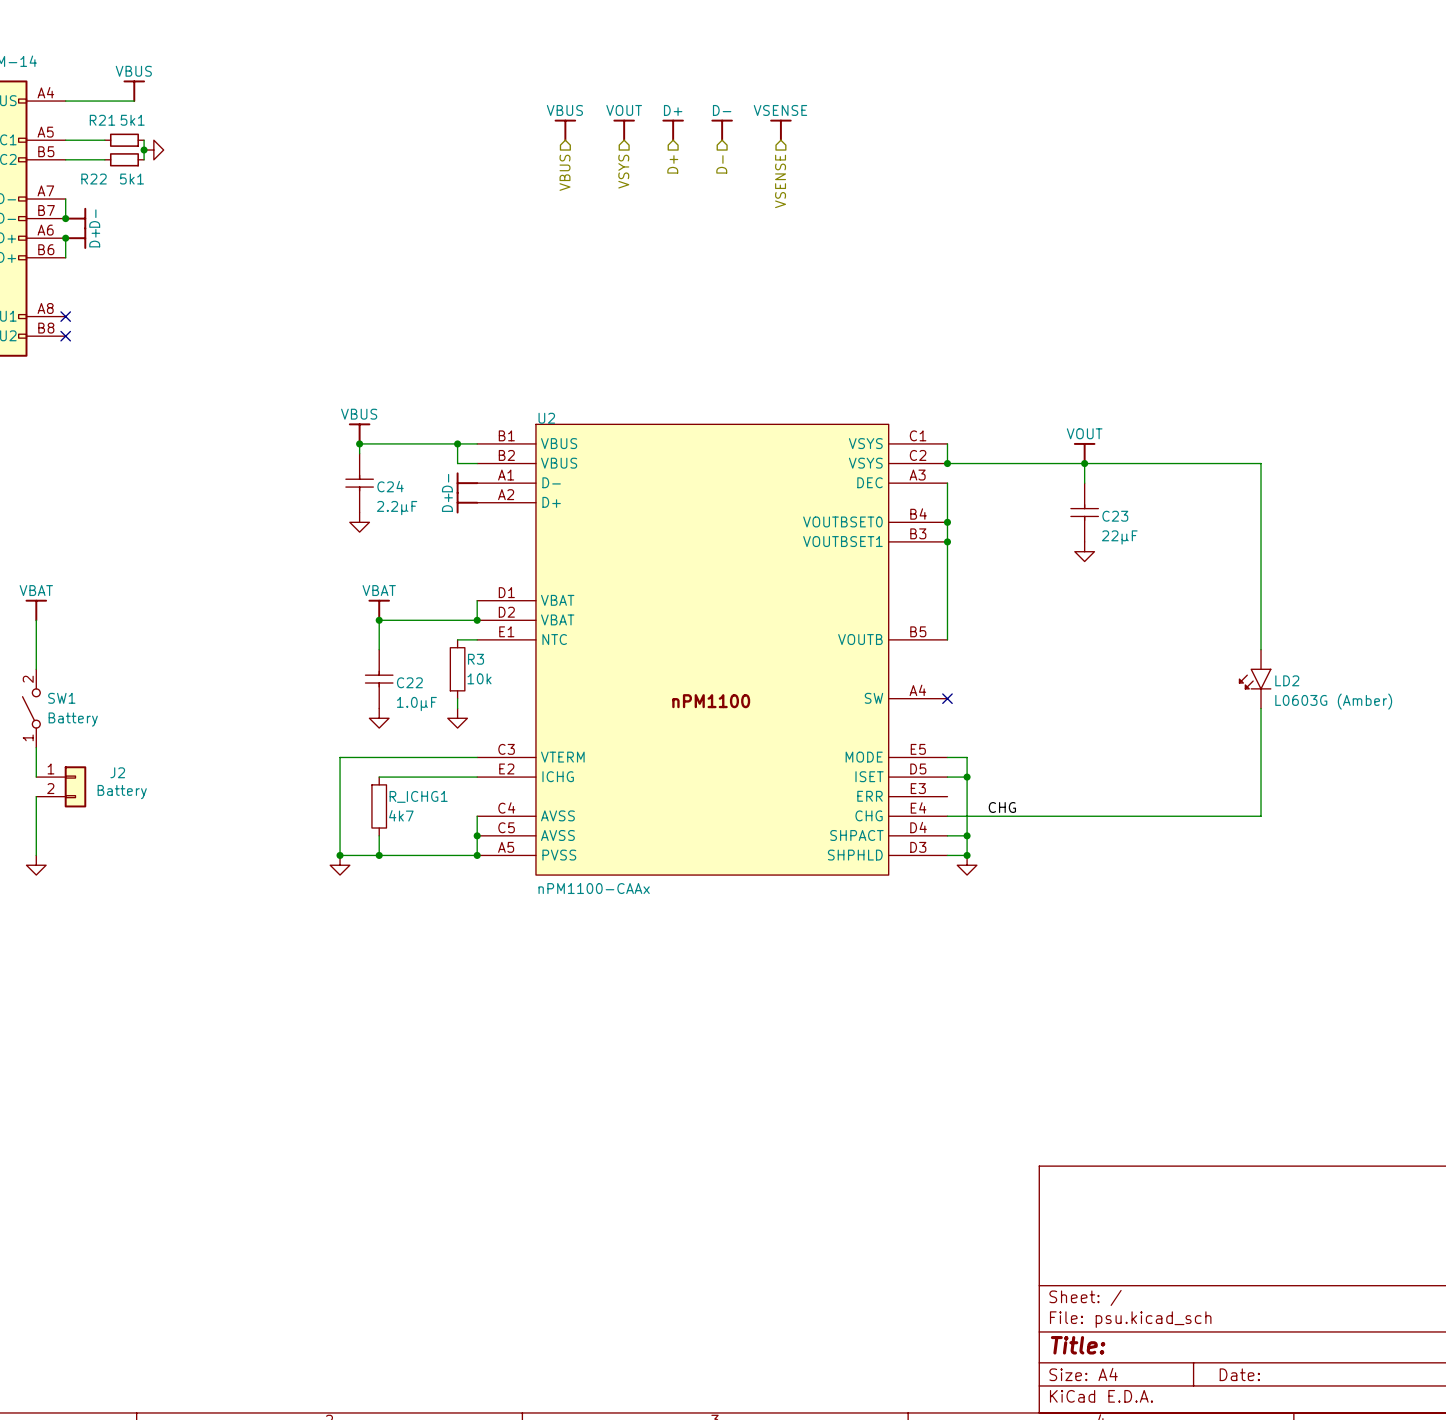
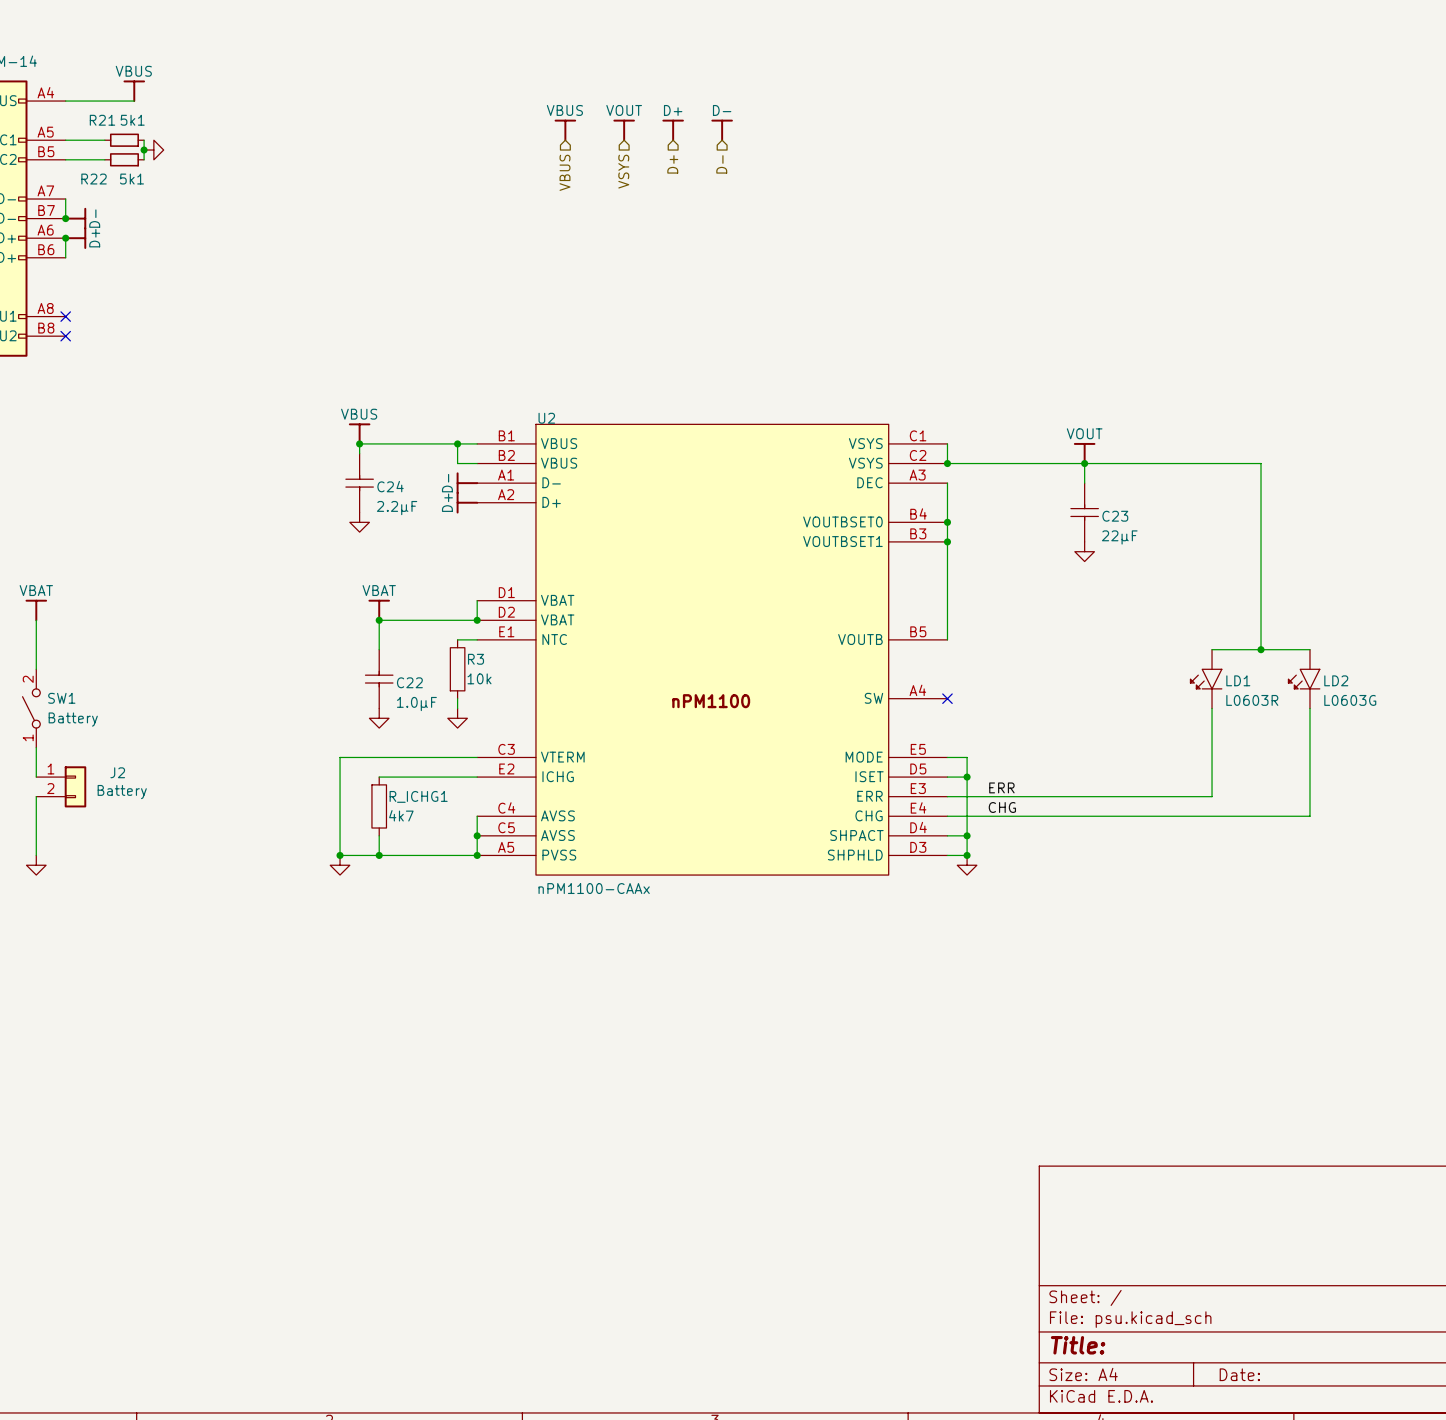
power symbol: VSENSE (780, 130) -> none
hierarchical label: VSENSE (780, 181) -> none
wire: none -> (1212, 649) (1309, 649)
junction: none -> (1261, 649)
LD1: none -> L0603R (1206, 679)
LD2 position: (1255, 679) -> (1304, 679)
LD2 value: L0603G (Amber) (1333, 701) -> L0603G (1350, 700)
wire: none -> (1212, 708) (1212, 796) (947, 796)
wire: (1261, 708) (1261, 816) -> (1309, 708) (1309, 816) (1261, 816)
label: none -> ERR (1001, 787)

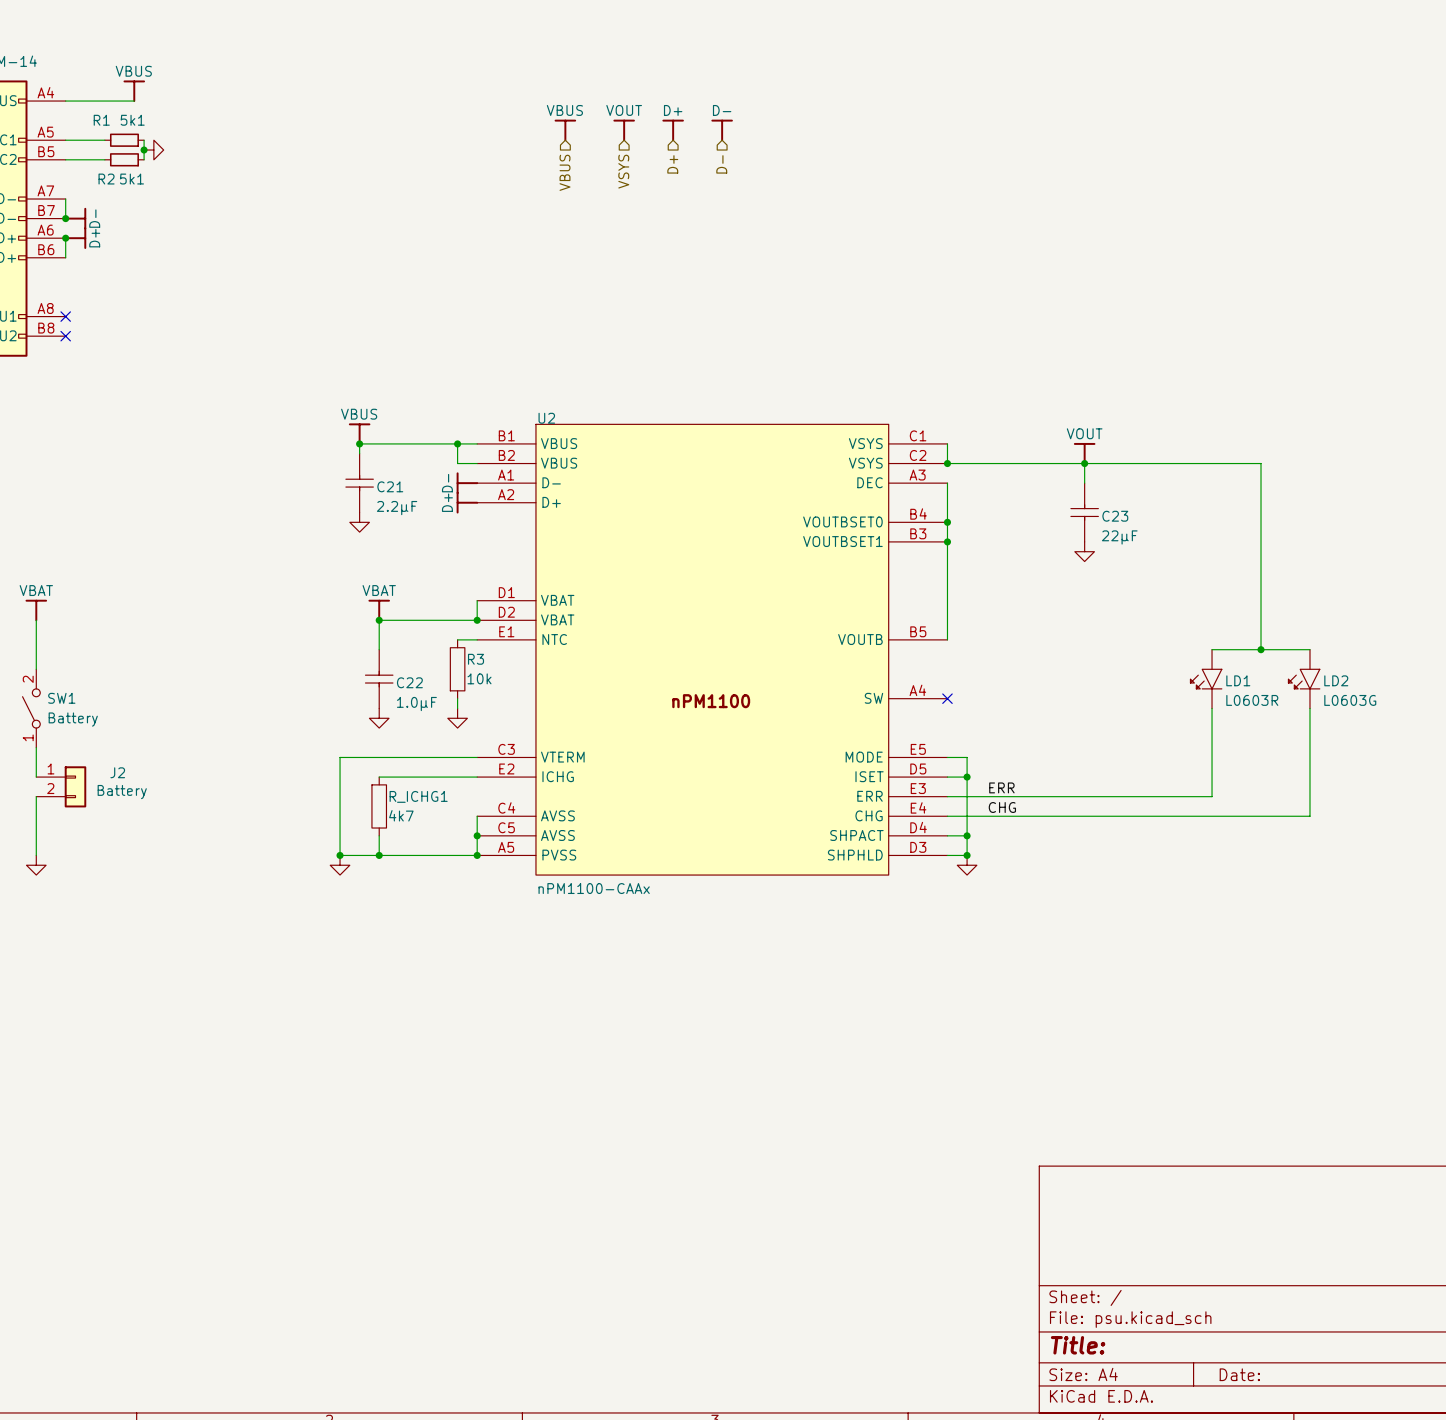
R21 name: R21 (102, 120) -> R1 (101, 120)
R22 name: R22 (94, 179) -> R2 (106, 179)
C24 name: C24 (390, 486) -> C21 (390, 486)

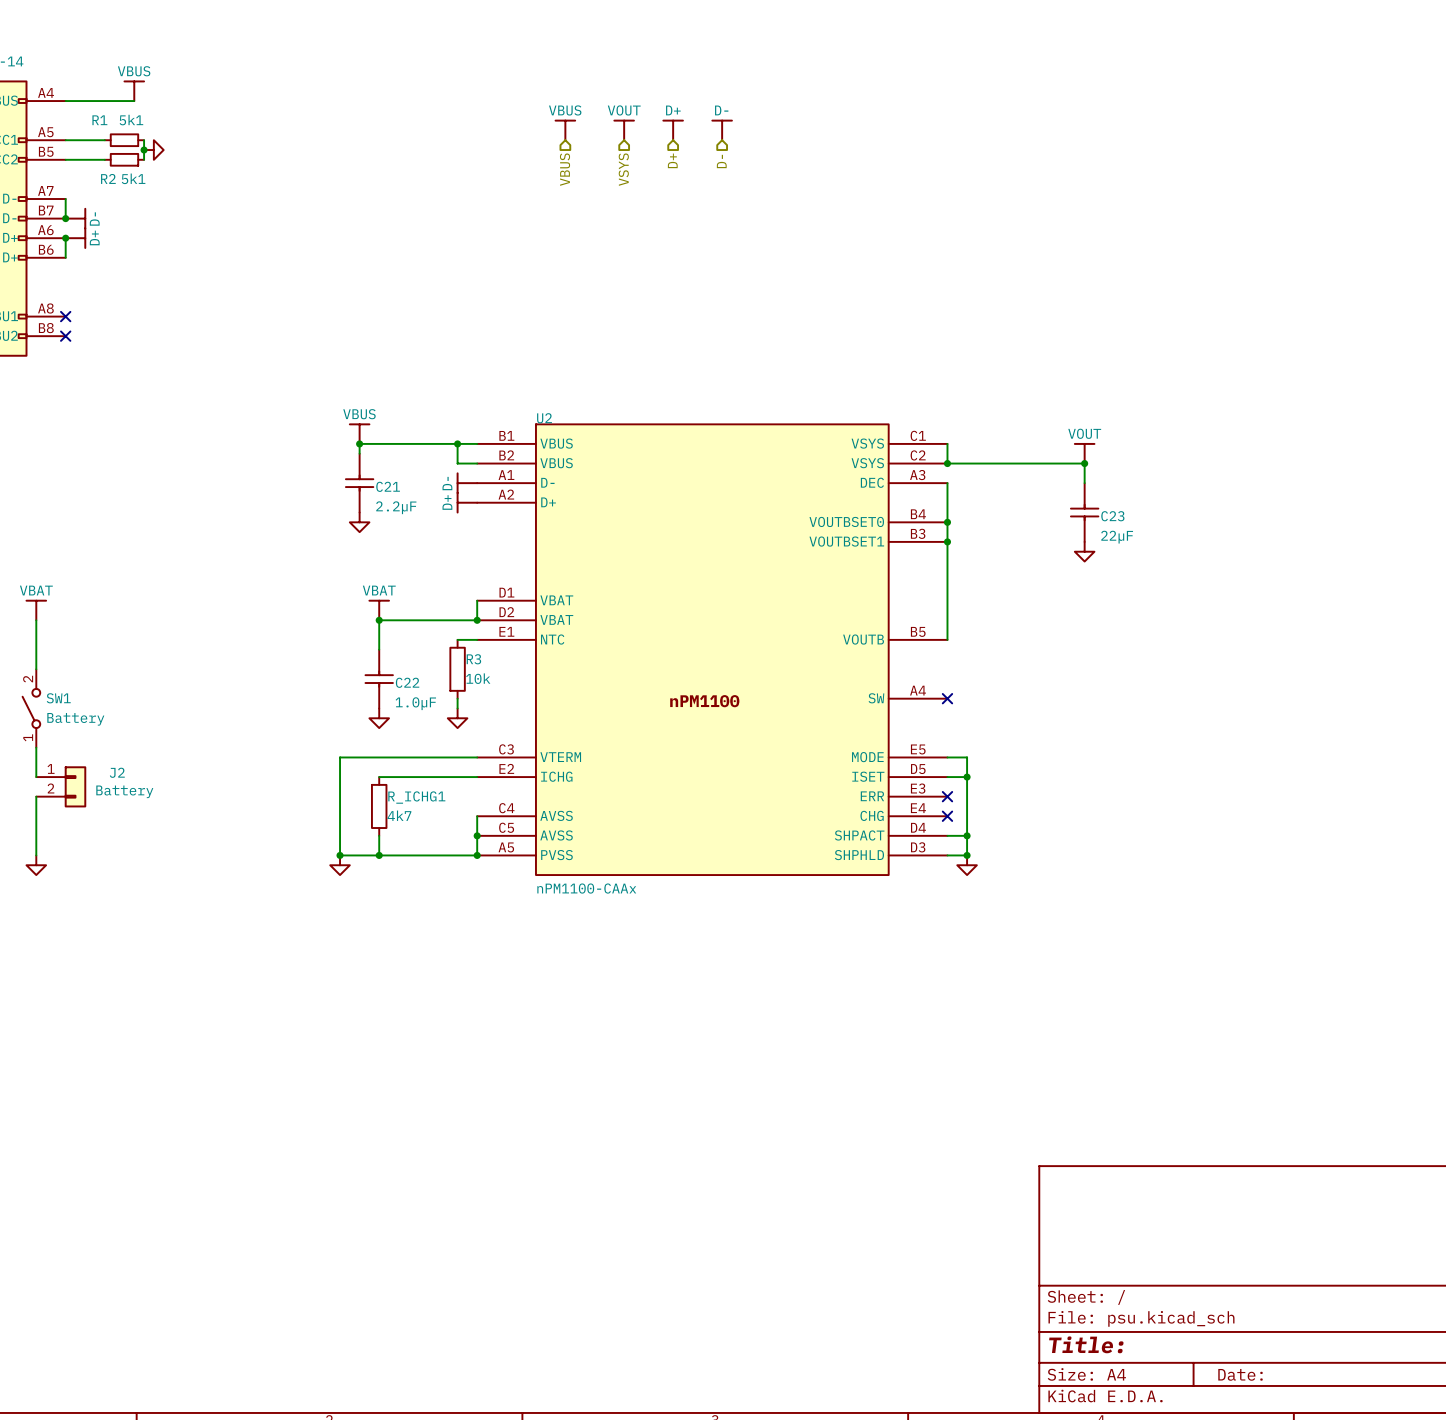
wire: (1084, 463) (1261, 463) (1261, 649) -> none
wire: (1212, 649) (1309, 649) -> none
junction: (1261, 649) -> none
LD1: L0603R (1206, 679) -> none
LD2: L0603G (1304, 679) -> none
wire: (1212, 708) (1212, 796) (947, 796) -> none
wire: (1309, 708) (1309, 816) (947, 816) -> none
label: ERR (1001, 787) -> none
no-connect mark: none -> (947, 796)
label: CHG (1002, 807) -> none
no-connect mark: none -> (947, 816)

